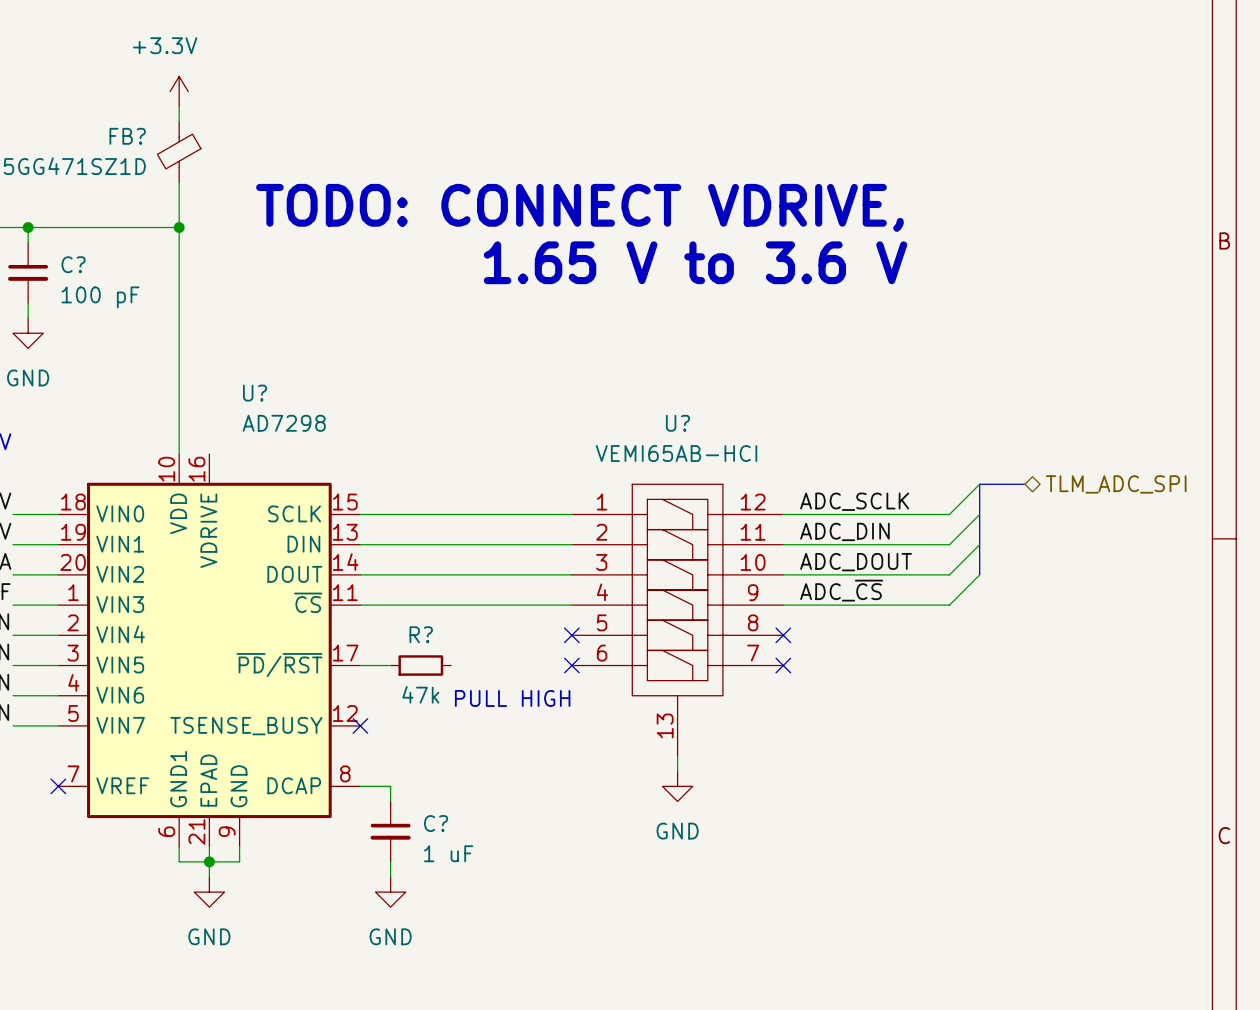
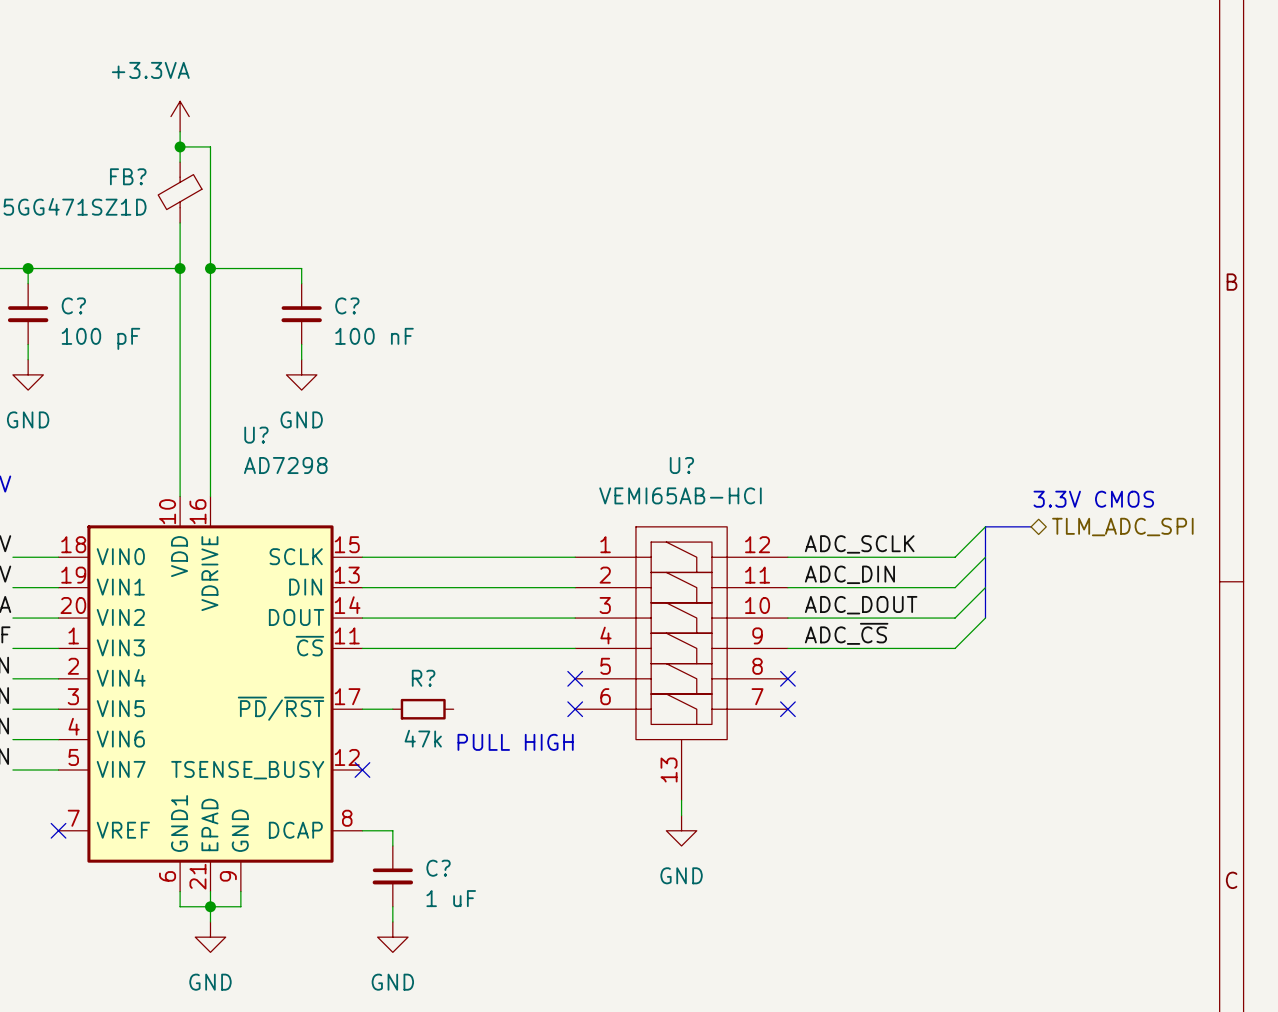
power symbol: none -> +3.3VA (180, 116)
wire: none -> (180, 131) (180, 146) (210, 146) (210, 496)
power symbol: +3.3V (179, 91) -> none
junction: none -> (180, 146)
text: TODO: CONNECT VDRIVE, (579, 207) -> none
wire: none -> (210, 268) (301, 268) (301, 283)
junction: none -> (210, 268)
text: 1.65 V to 3.6 V (695, 262) -> none
C?: none -> 100 nF (301, 314)
wire: none -> (301, 344) (301, 359)
power symbol: none -> GND (301, 374)
text: none -> 3.3V CMOS (1093, 499)

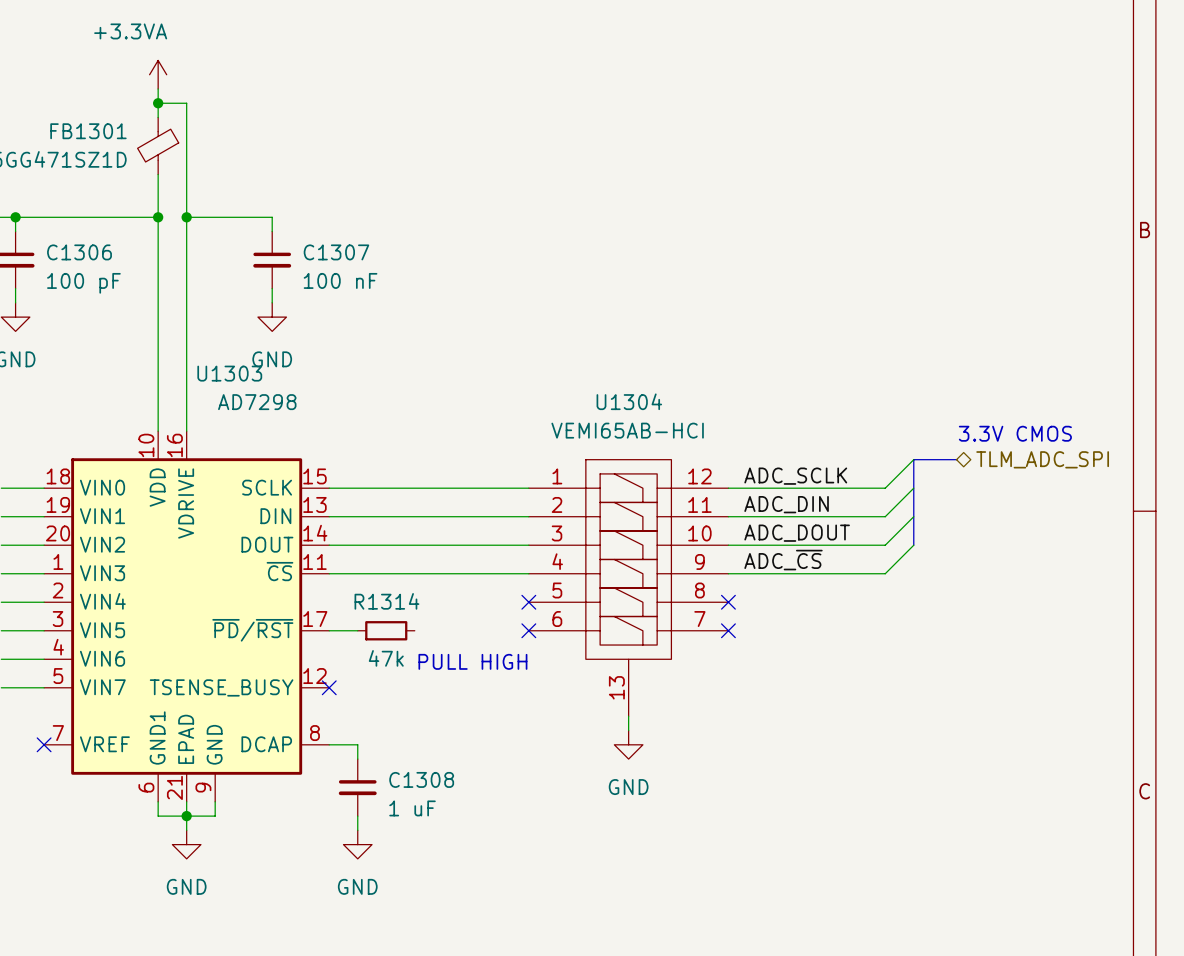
FB? name: FB? (128, 176) -> FB1301 (88, 131)
C? name: C? (73, 305) -> C1306 (79, 252)
C? name: C? (347, 305) -> C1307 (336, 252)
U? name: U? (256, 435) -> U1303 (229, 373)
U? name: U? (681, 465) -> U1304 (629, 401)
R? name: R? (423, 678) -> R1314 (386, 601)
C? name: C? (438, 868) -> C1308 (421, 779)

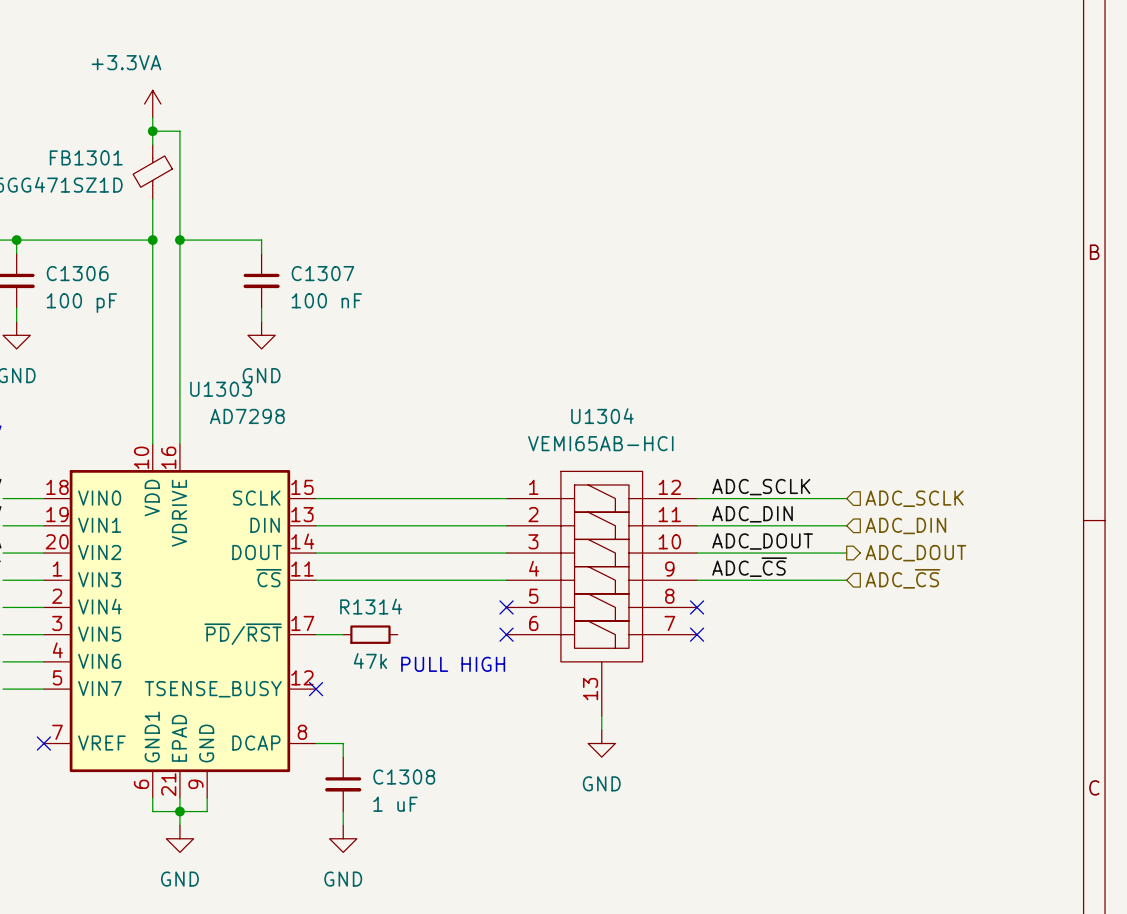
text: 3.3V CMOS (1015, 433) -> none
wire: (913, 459) (885, 488) -> none
bus: (956, 459) (913, 459) (913, 545) -> none
hierarchical label: TLM_ADC_SPI (1042, 459) -> none
wire: (913, 488) (885, 516) -> none
hierarchical label: none -> ADC_SCLK (914, 498)
wire: (913, 516) (885, 545) -> none
hierarchical label: none -> ADC_DIN (905, 525)
wire: (913, 545) (885, 573) -> none
hierarchical label: none -> ADC_DOUT (915, 553)
hierarchical label: none -> ADC_~{CS} (902, 578)

